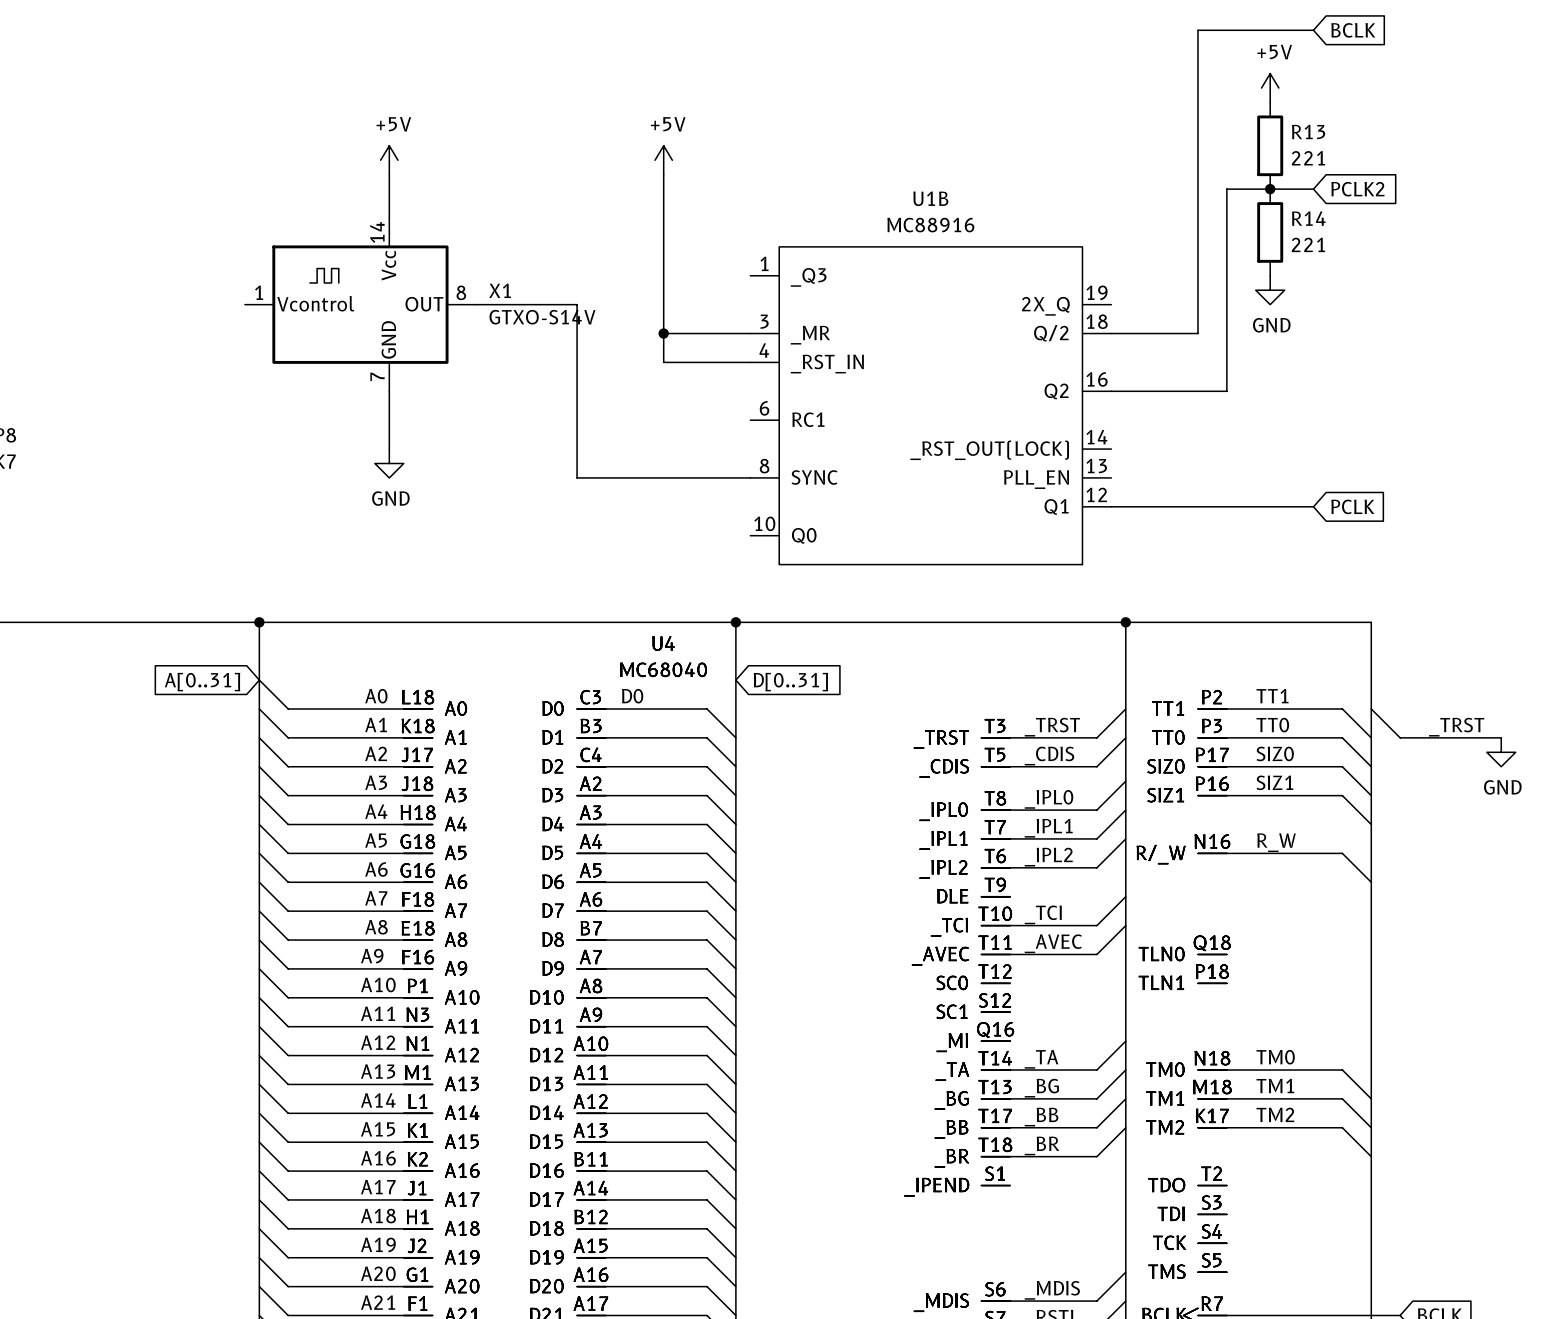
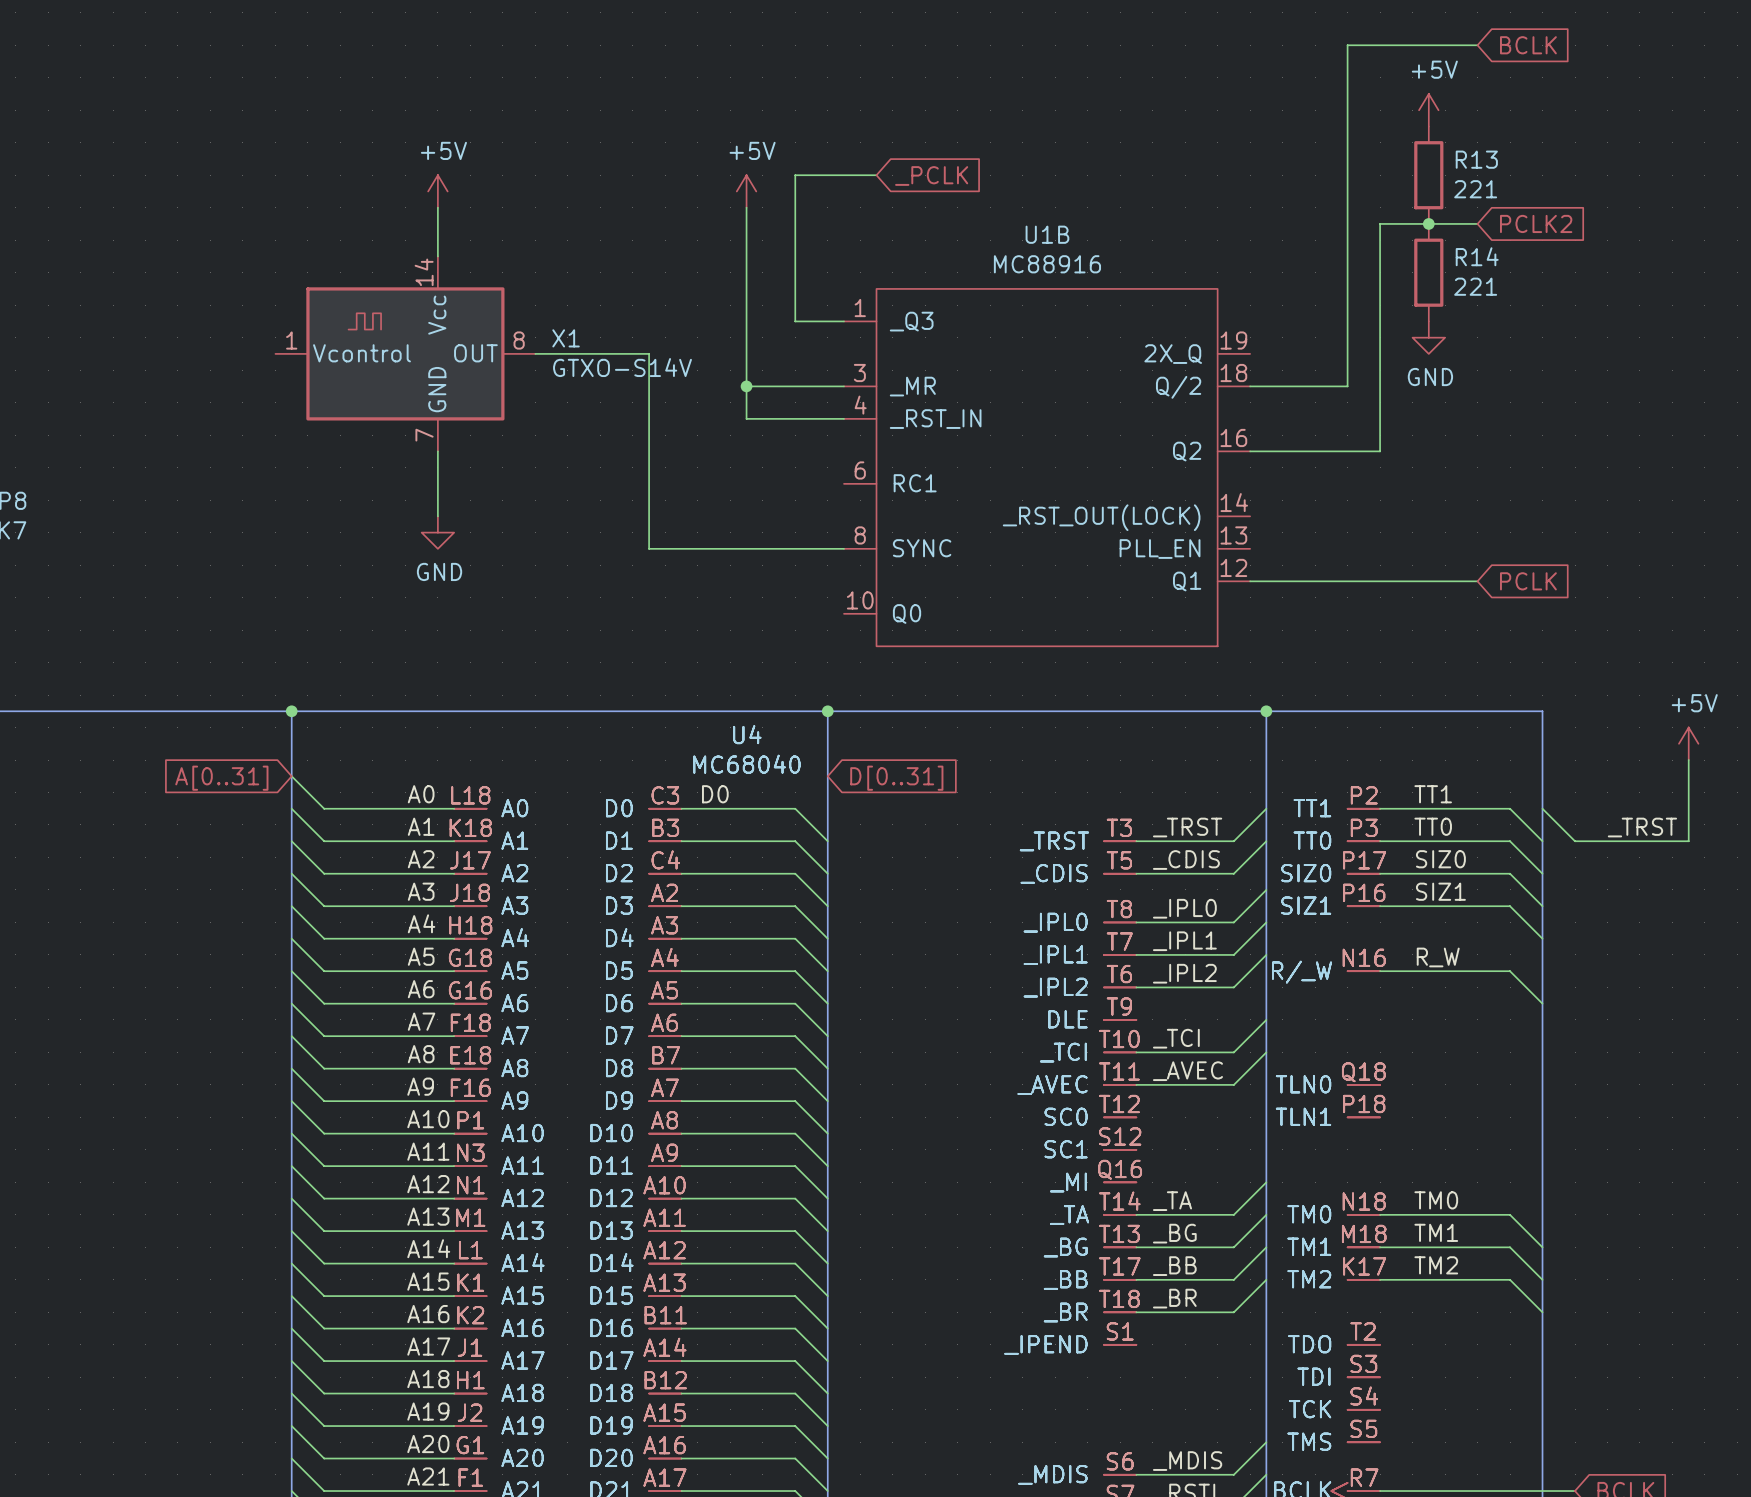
wire: none -> (876, 175) (795, 175) (795, 321) (844, 321)
global label: none -> _PCLK (931, 176)
power symbol: none -> +5V (1688, 743)
wire: none -> (1688, 760) (1688, 841)
power symbol: GND (1501, 752) -> none

